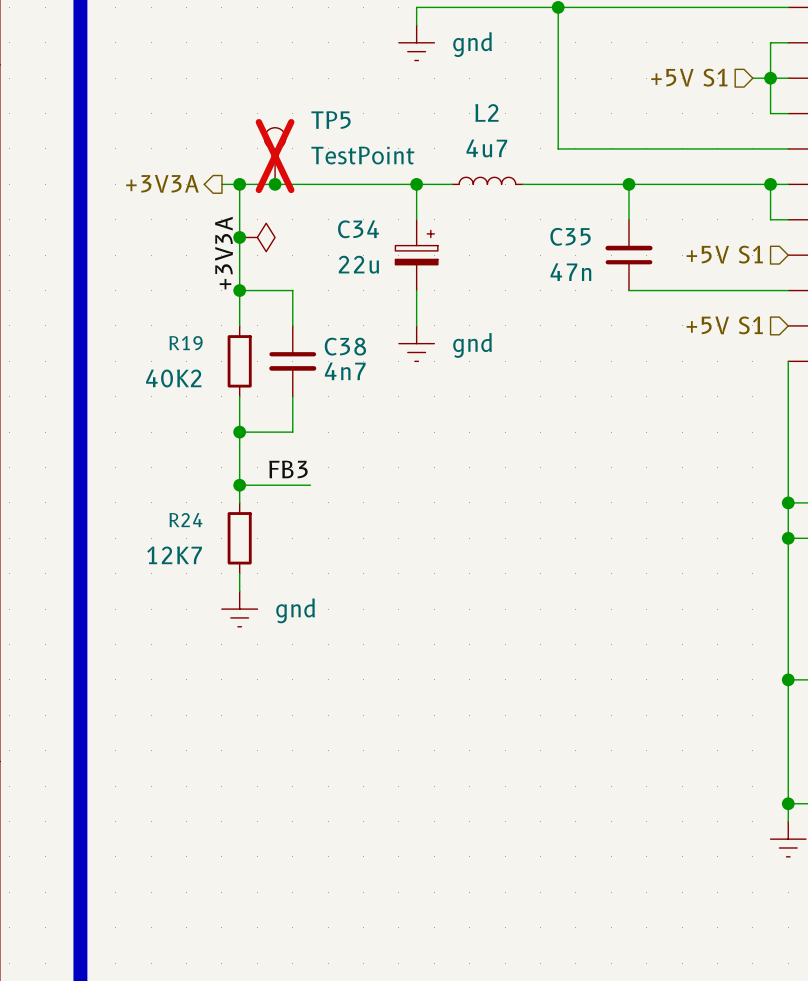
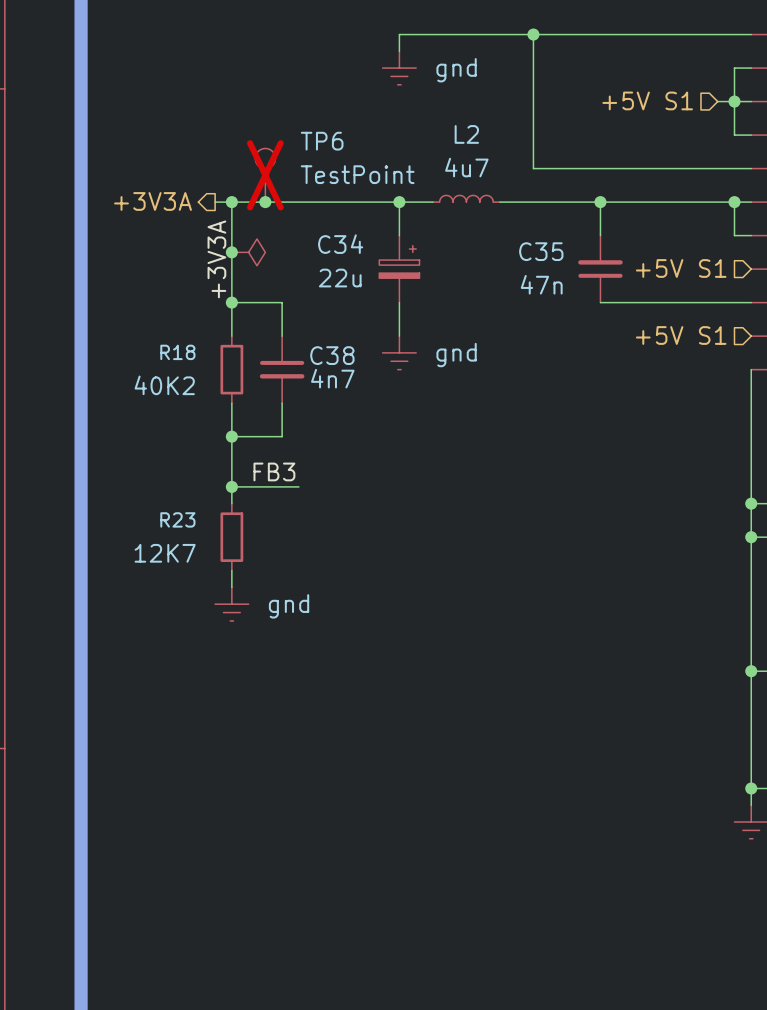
TP5 name: TP5 (331, 120) -> TP6 (322, 141)
R19 name: R19 (186, 343) -> R18 (177, 352)
R24 name: R24 (185, 520) -> R23 (177, 519)

